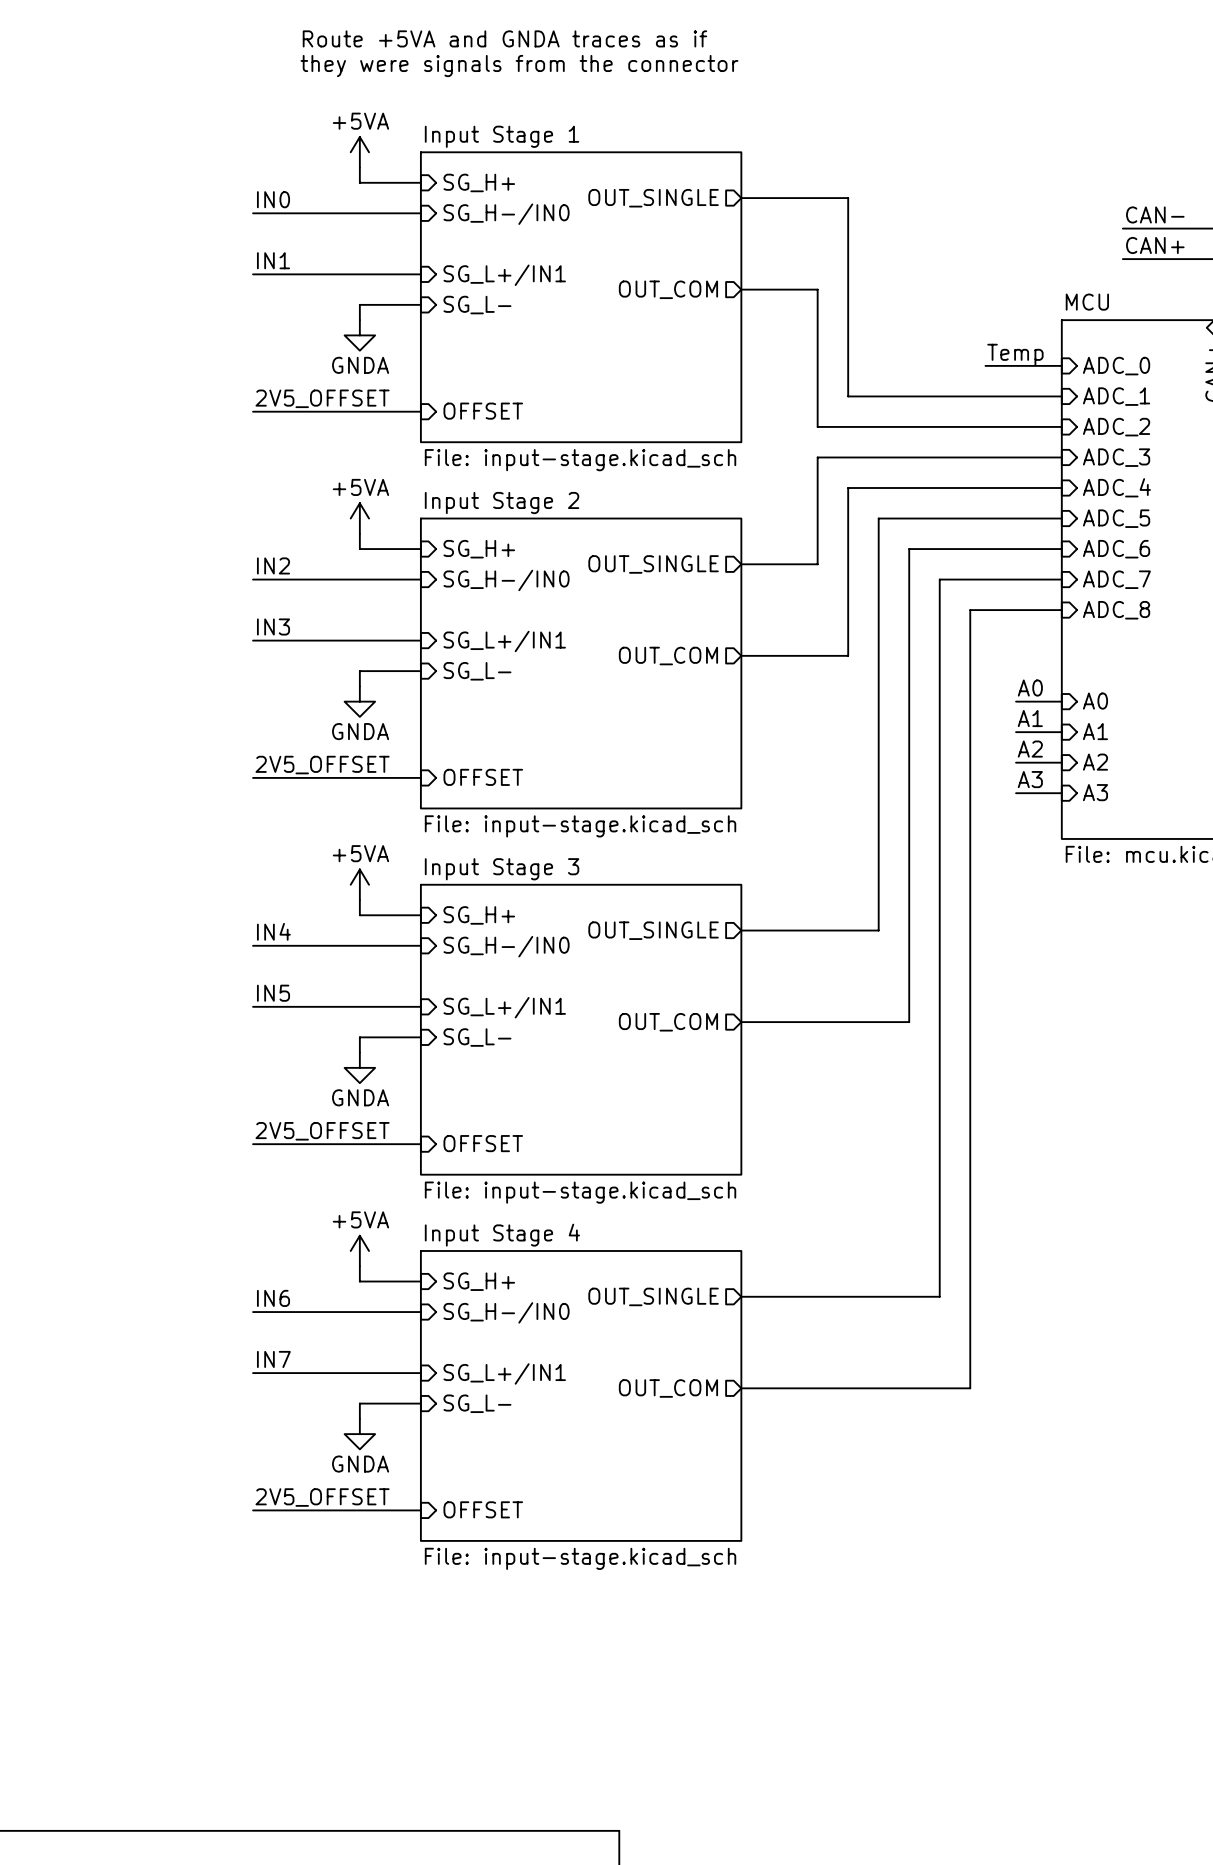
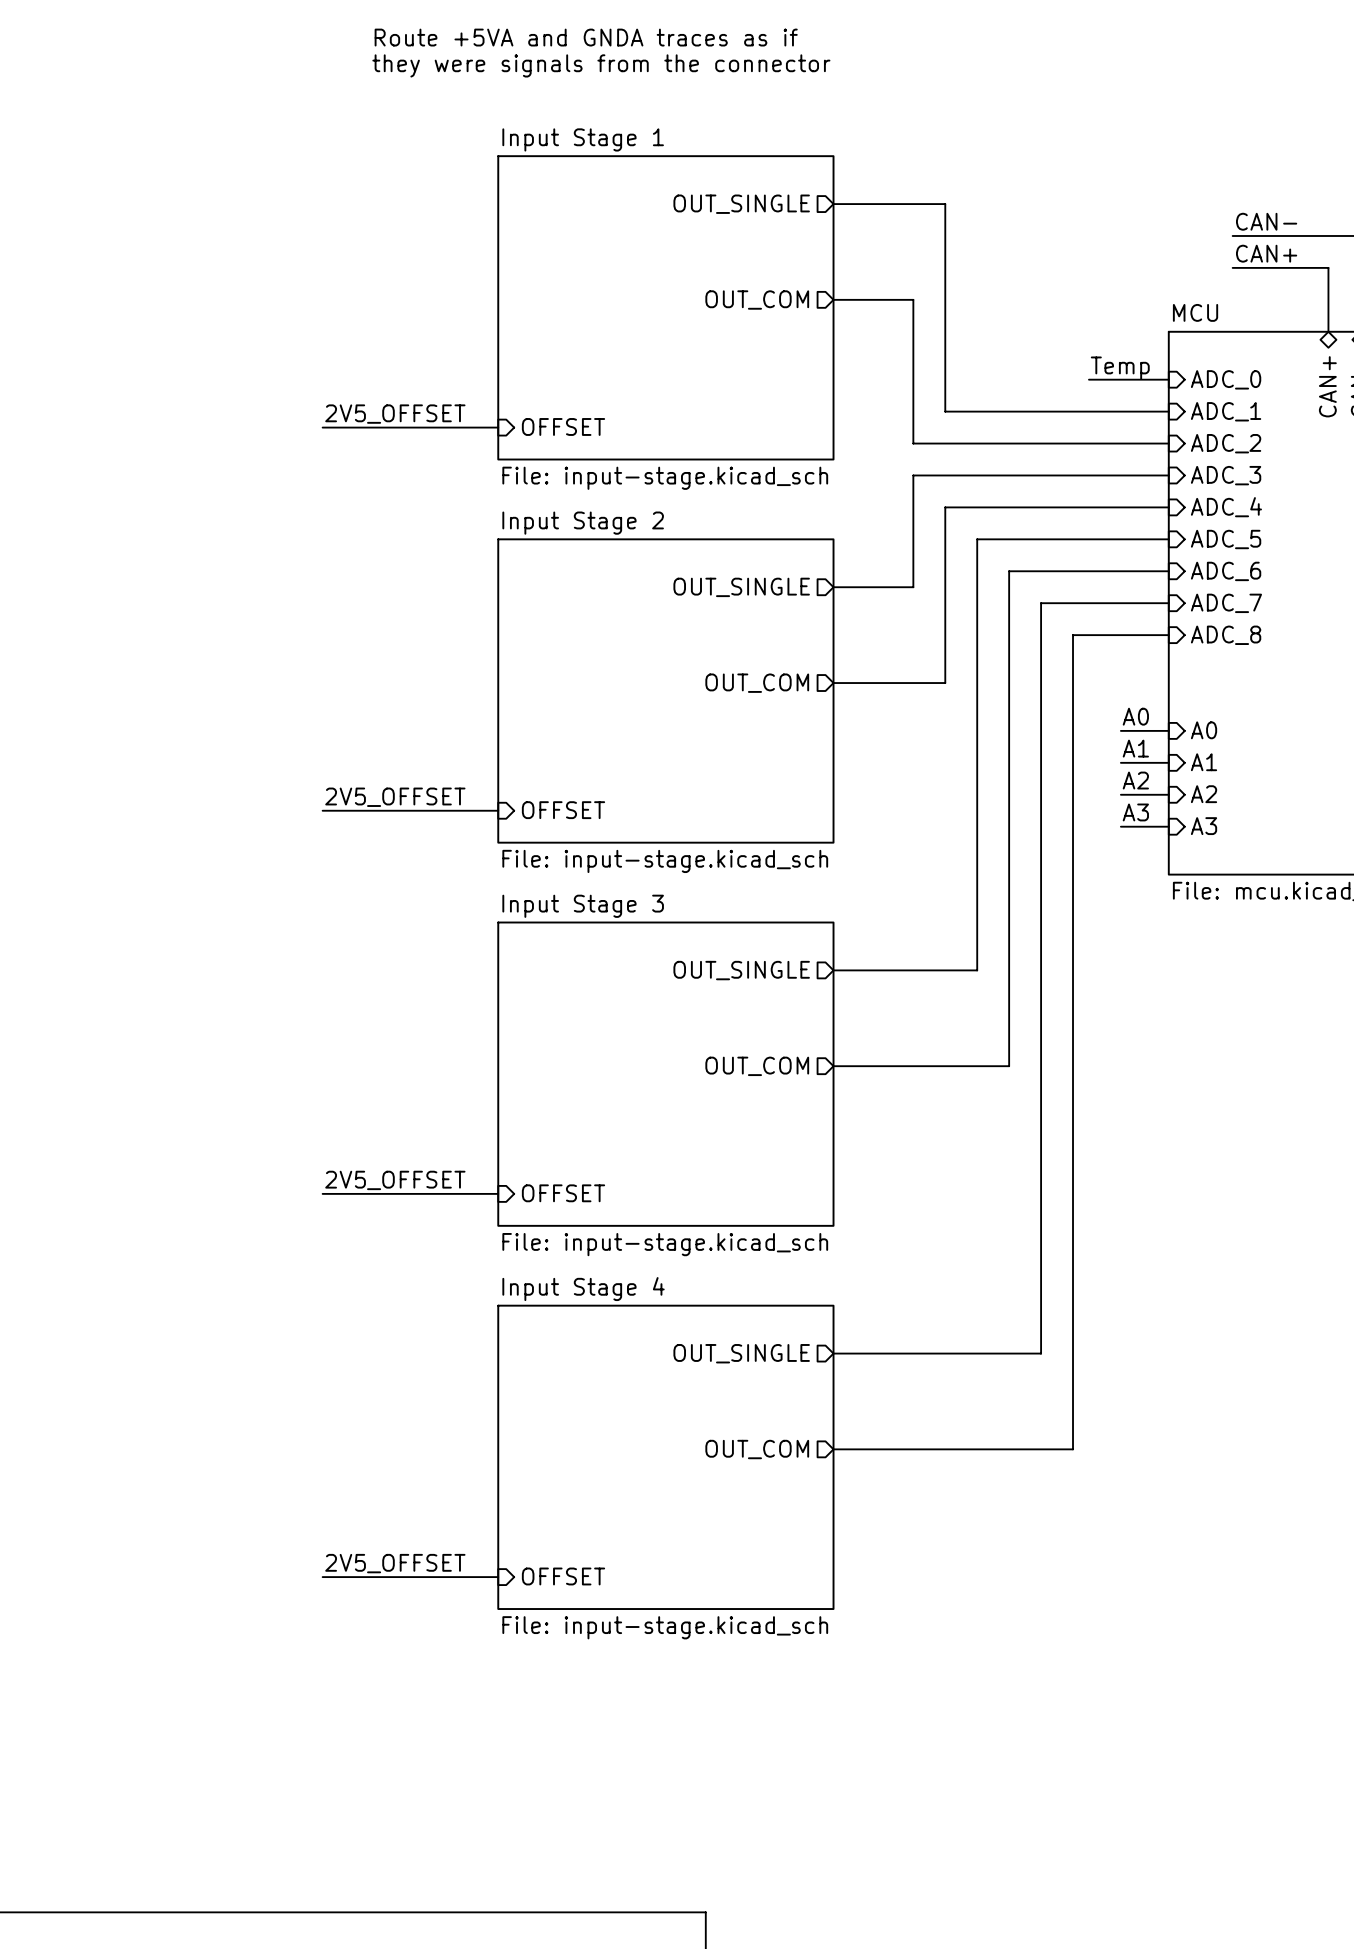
power symbol: +5VA (359, 152) -> none
wire: (359, 167) (359, 182) (420, 182) -> none
sheet pin: SG_H+ (479, 182) -> none
label: IN0 (273, 199) -> none
wire: (253, 213) (420, 213) -> none
sheet pin: SG_H-/IN0 (506, 214) -> none
label: IN1 (273, 260) -> none
wire: (253, 274) (420, 274) -> none
sheet pin: SG_L+/IN1 (504, 275) -> none
wire: (420, 304) (359, 304) (359, 320) -> none
sheet pin: SG_L- (477, 305) -> none
power symbol: GNDA (359, 335) -> none
power symbol: +5VA (359, 518) -> none
wire: (359, 533) (359, 549) (420, 549) -> none
sheet pin: SG_H+ (479, 549) -> none
label: IN2 (273, 565) -> none
wire: (253, 579) (420, 579) -> none
sheet pin: SG_H-/IN0 (506, 580) -> none
label: IN3 (273, 626) -> none
wire: (253, 640) (420, 640) -> none
sheet pin: SG_L+/IN1 (504, 641) -> none
wire: (420, 671) (359, 671) (359, 686) -> none
sheet pin: SG_L- (477, 671) -> none
power symbol: GNDA (359, 701) -> none
power symbol: +5VA (359, 884) -> none
wire: (359, 900) (359, 915) (420, 915) -> none
sheet pin: SG_H+ (479, 915) -> none
label: IN4 (273, 931) -> none
wire: (253, 945) (420, 945) -> none
sheet pin: SG_H-/IN0 (506, 946) -> none
label: IN5 (273, 993) -> none
wire: (253, 1006) (420, 1006) -> none
sheet pin: SG_L+/IN1 (504, 1007) -> none
wire: (420, 1037) (359, 1037) (359, 1052) -> none
sheet pin: SG_L- (477, 1037) -> none
power symbol: GNDA (359, 1067) -> none
power symbol: +5VA (359, 1250) -> none
wire: (359, 1266) (359, 1281) (420, 1281) -> none
sheet pin: SG_H+ (479, 1281) -> none
label: IN6 (273, 1298) -> none
wire: (253, 1312) (420, 1312) -> none
sheet pin: SG_H-/IN0 (506, 1312) -> none
label: IN7 (273, 1359) -> none
wire: (253, 1373) (420, 1373) -> none
sheet pin: SG_L+/IN1 (504, 1373) -> none
wire: (420, 1403) (359, 1403) (359, 1418) -> none
sheet pin: SG_L- (477, 1403) -> none
power symbol: GNDA (359, 1434) -> none

